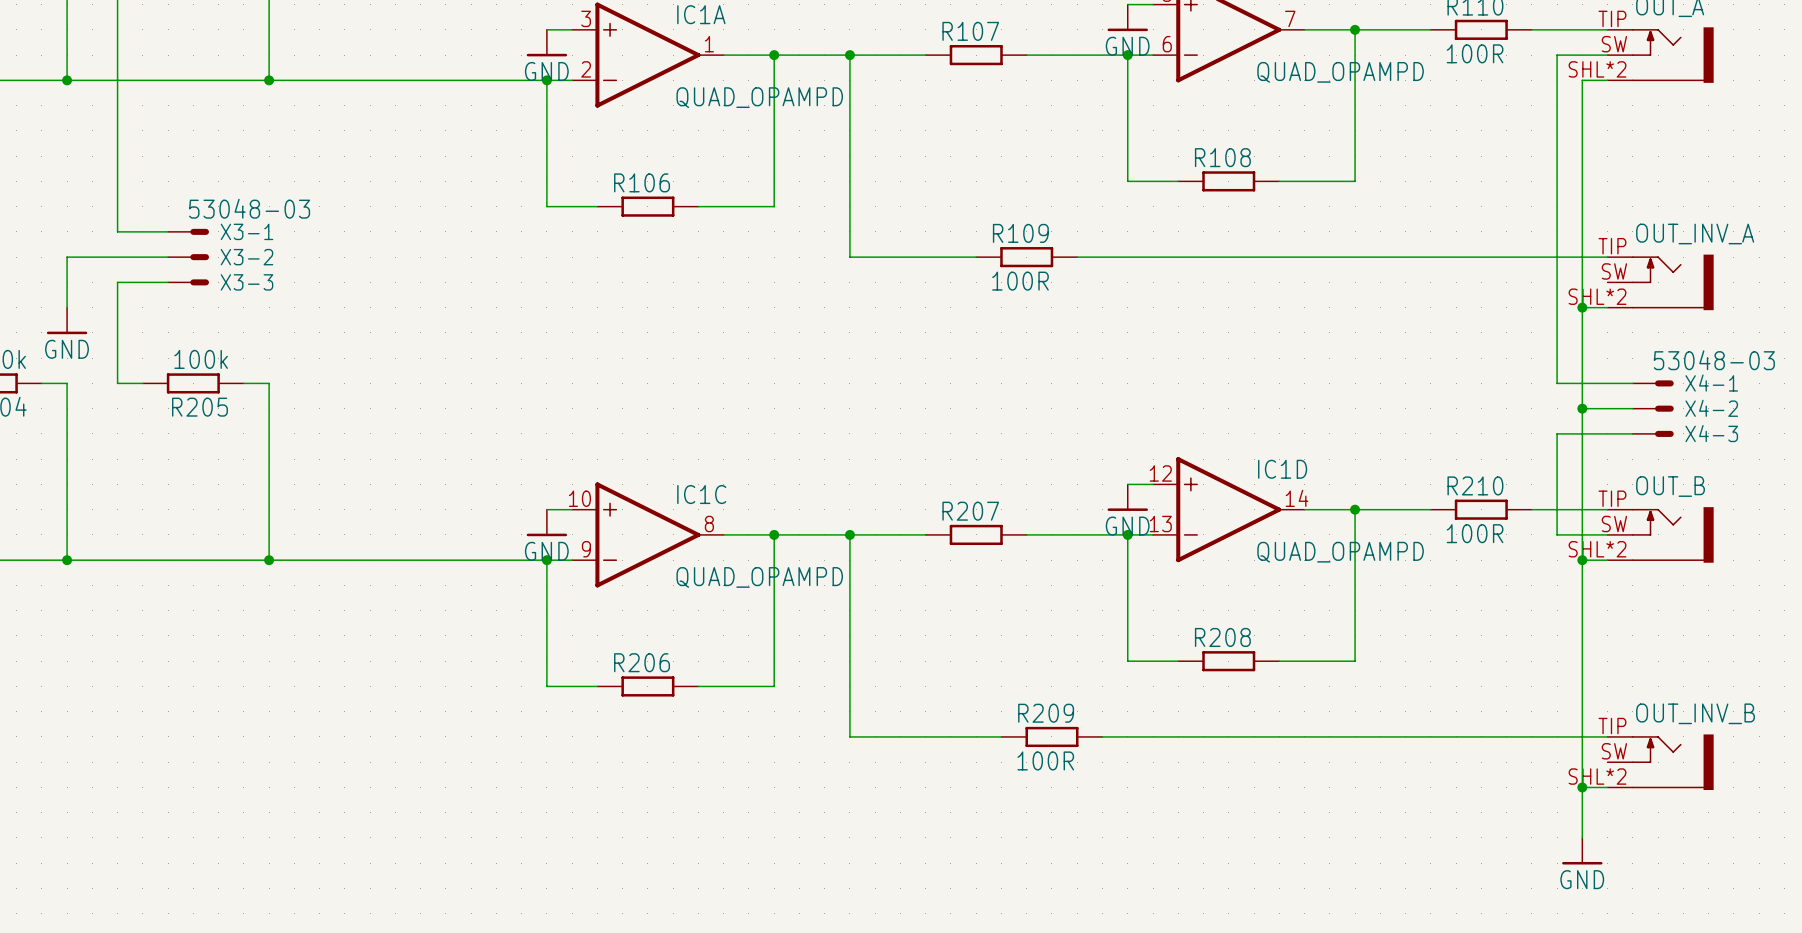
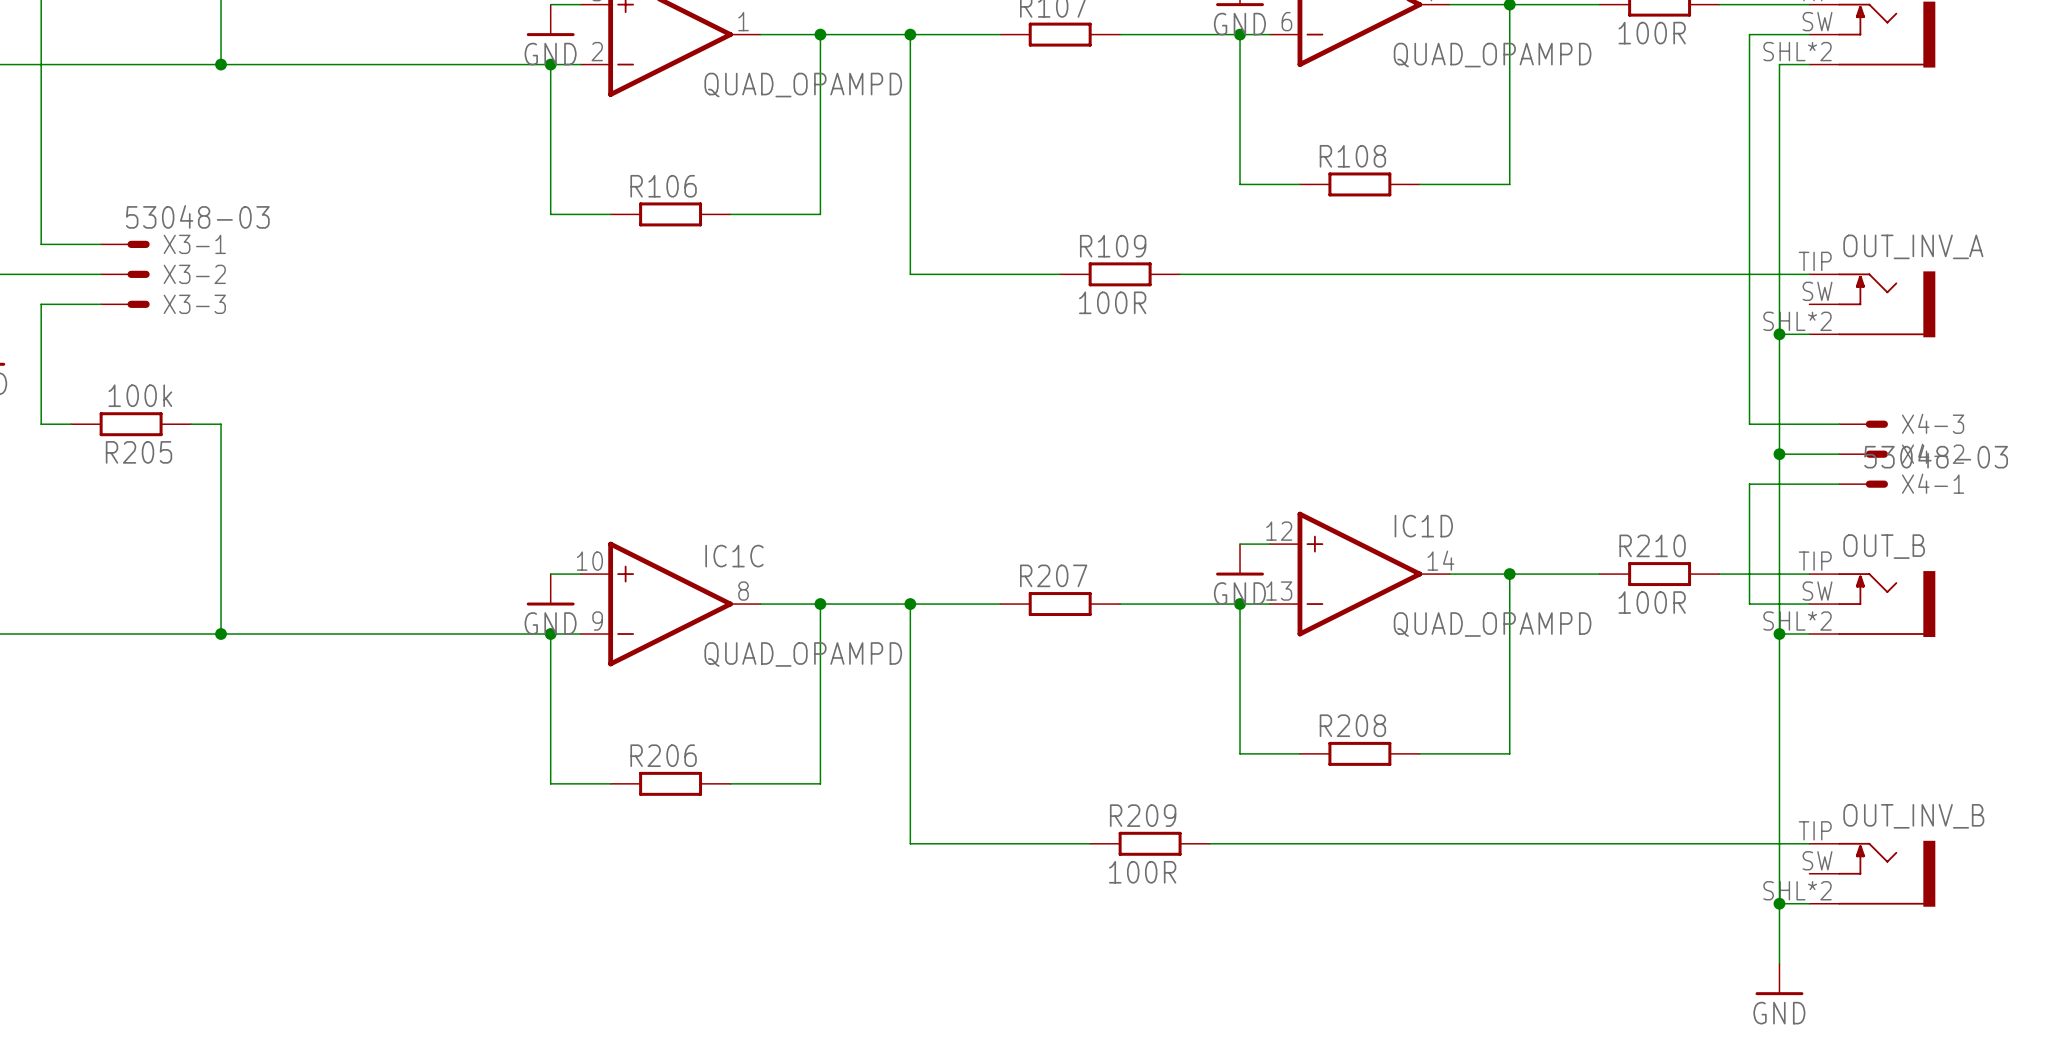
X4-1 value: 53048-03 (1714, 360) -> none
X4-1 name: X4-1 (1711, 383) -> X4-3 (1933, 423)
X4-3 value: none -> 53048-03 (1936, 456)
X4-3 name: X4-3 (1711, 433) -> X4-1 (1933, 483)

